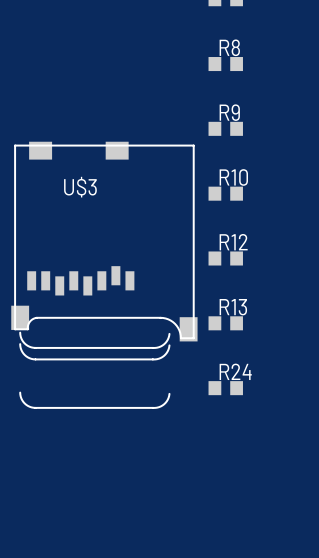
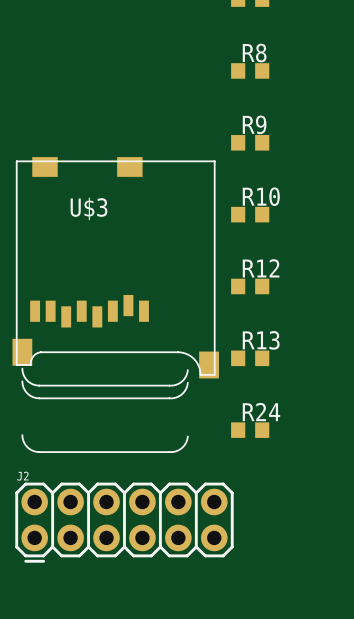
J2: none -> (124, 522)

